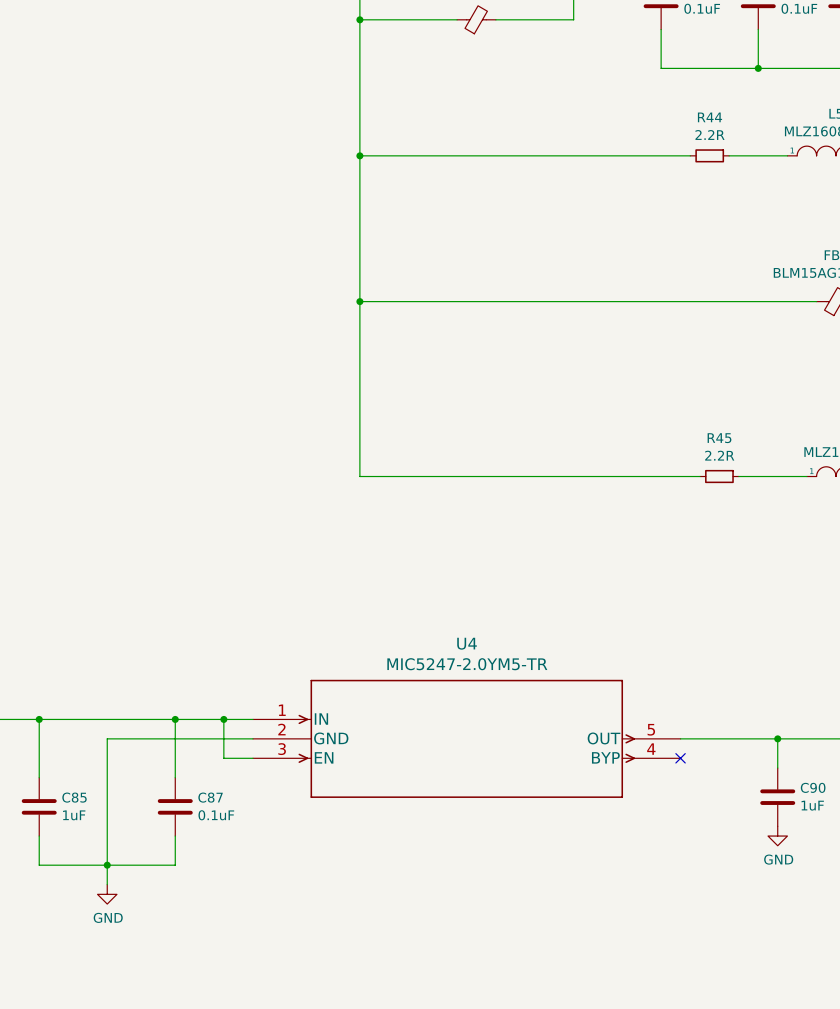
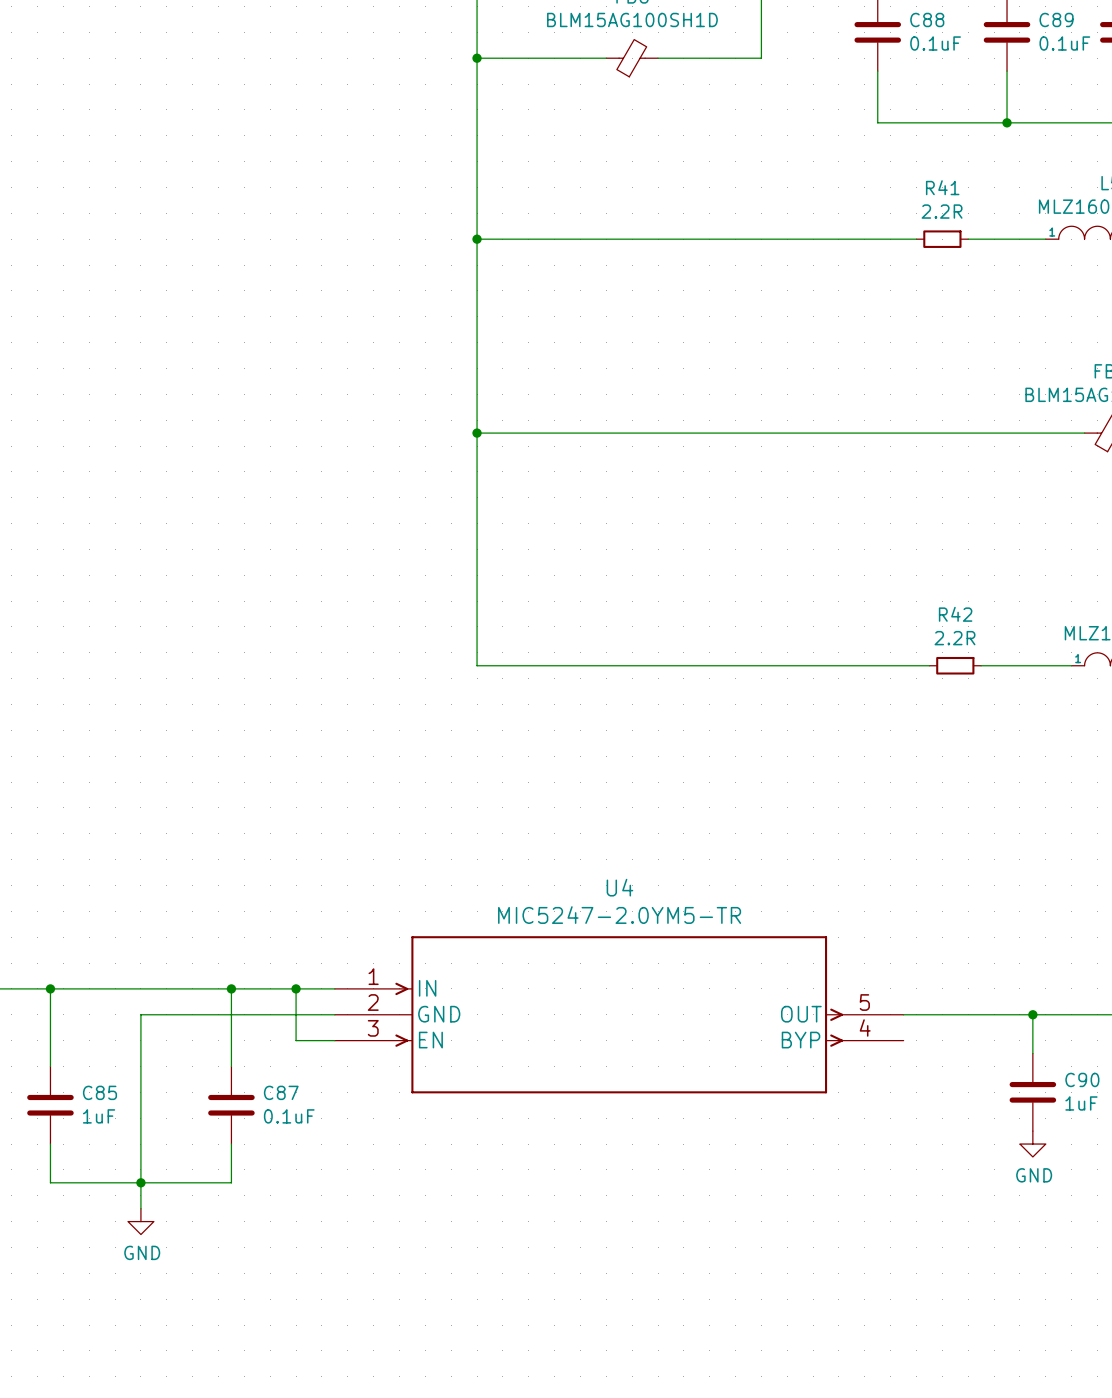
R44 name: R44 (709, 117) -> R41 (942, 187)
R45 name: R45 (719, 438) -> R42 (955, 614)
no-connect mark: (680, 758) -> none

